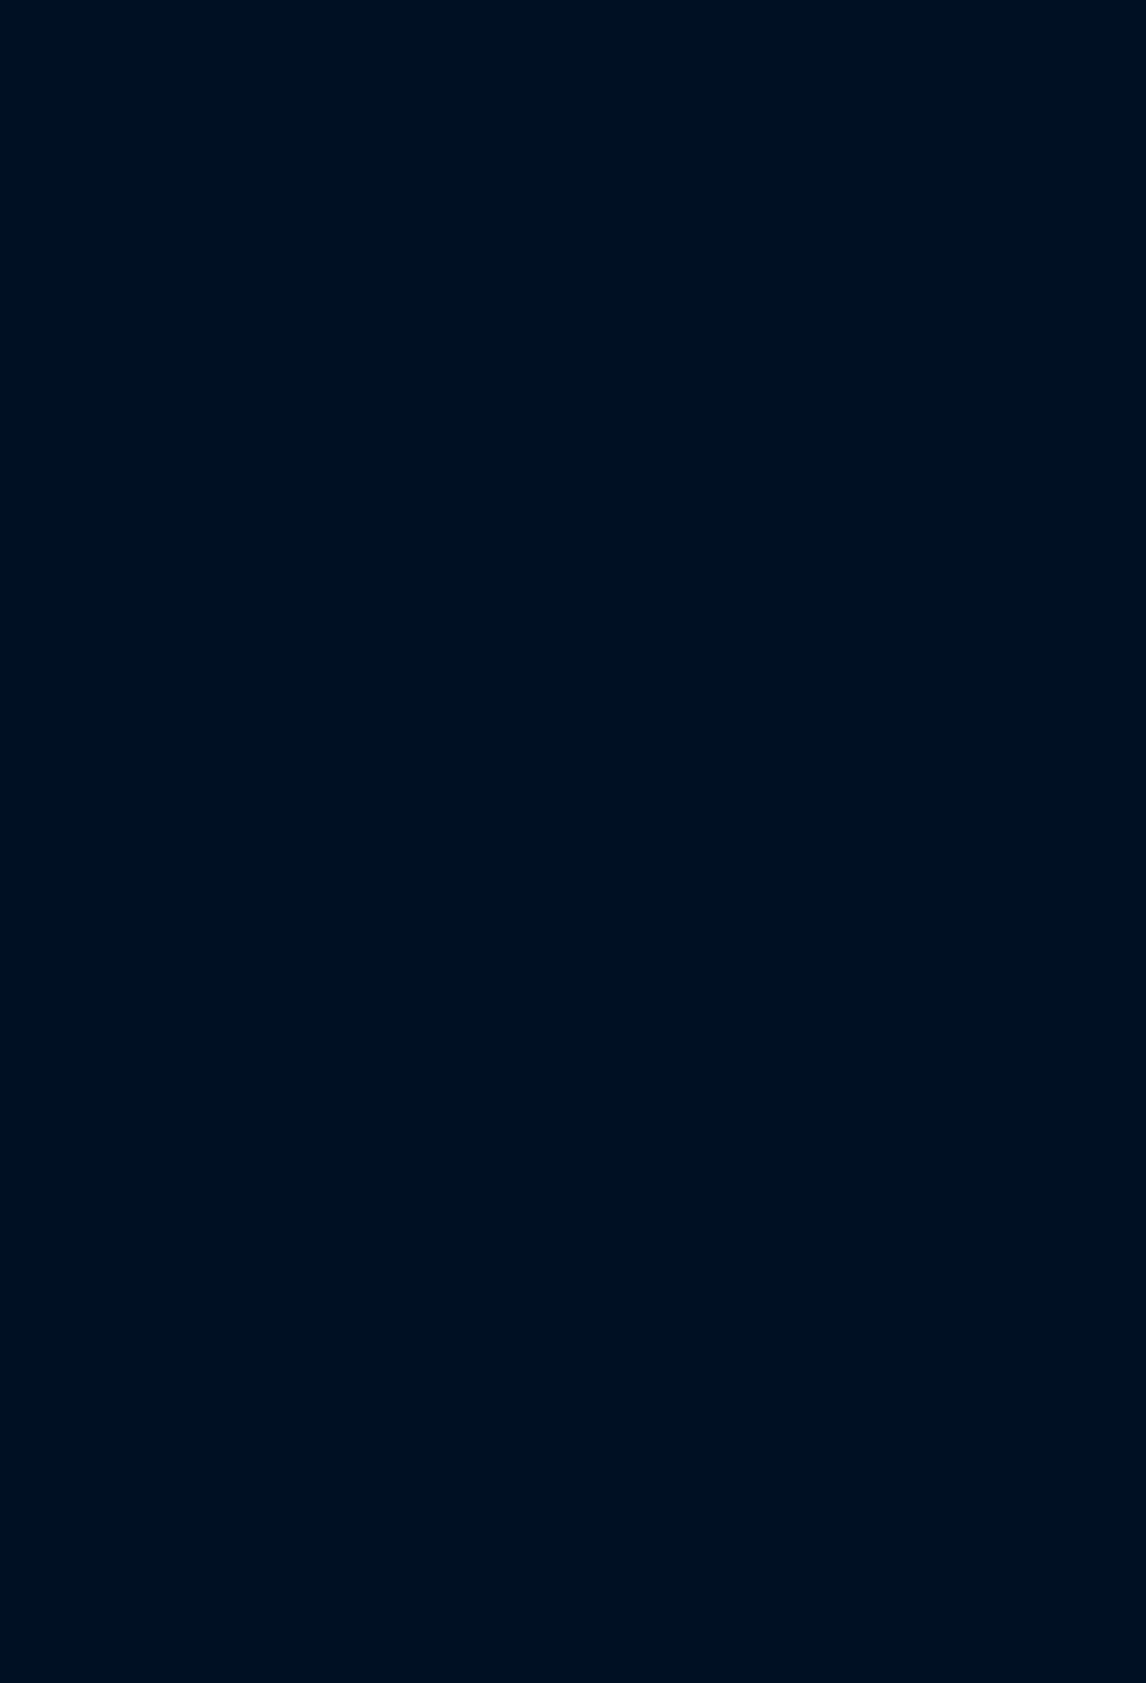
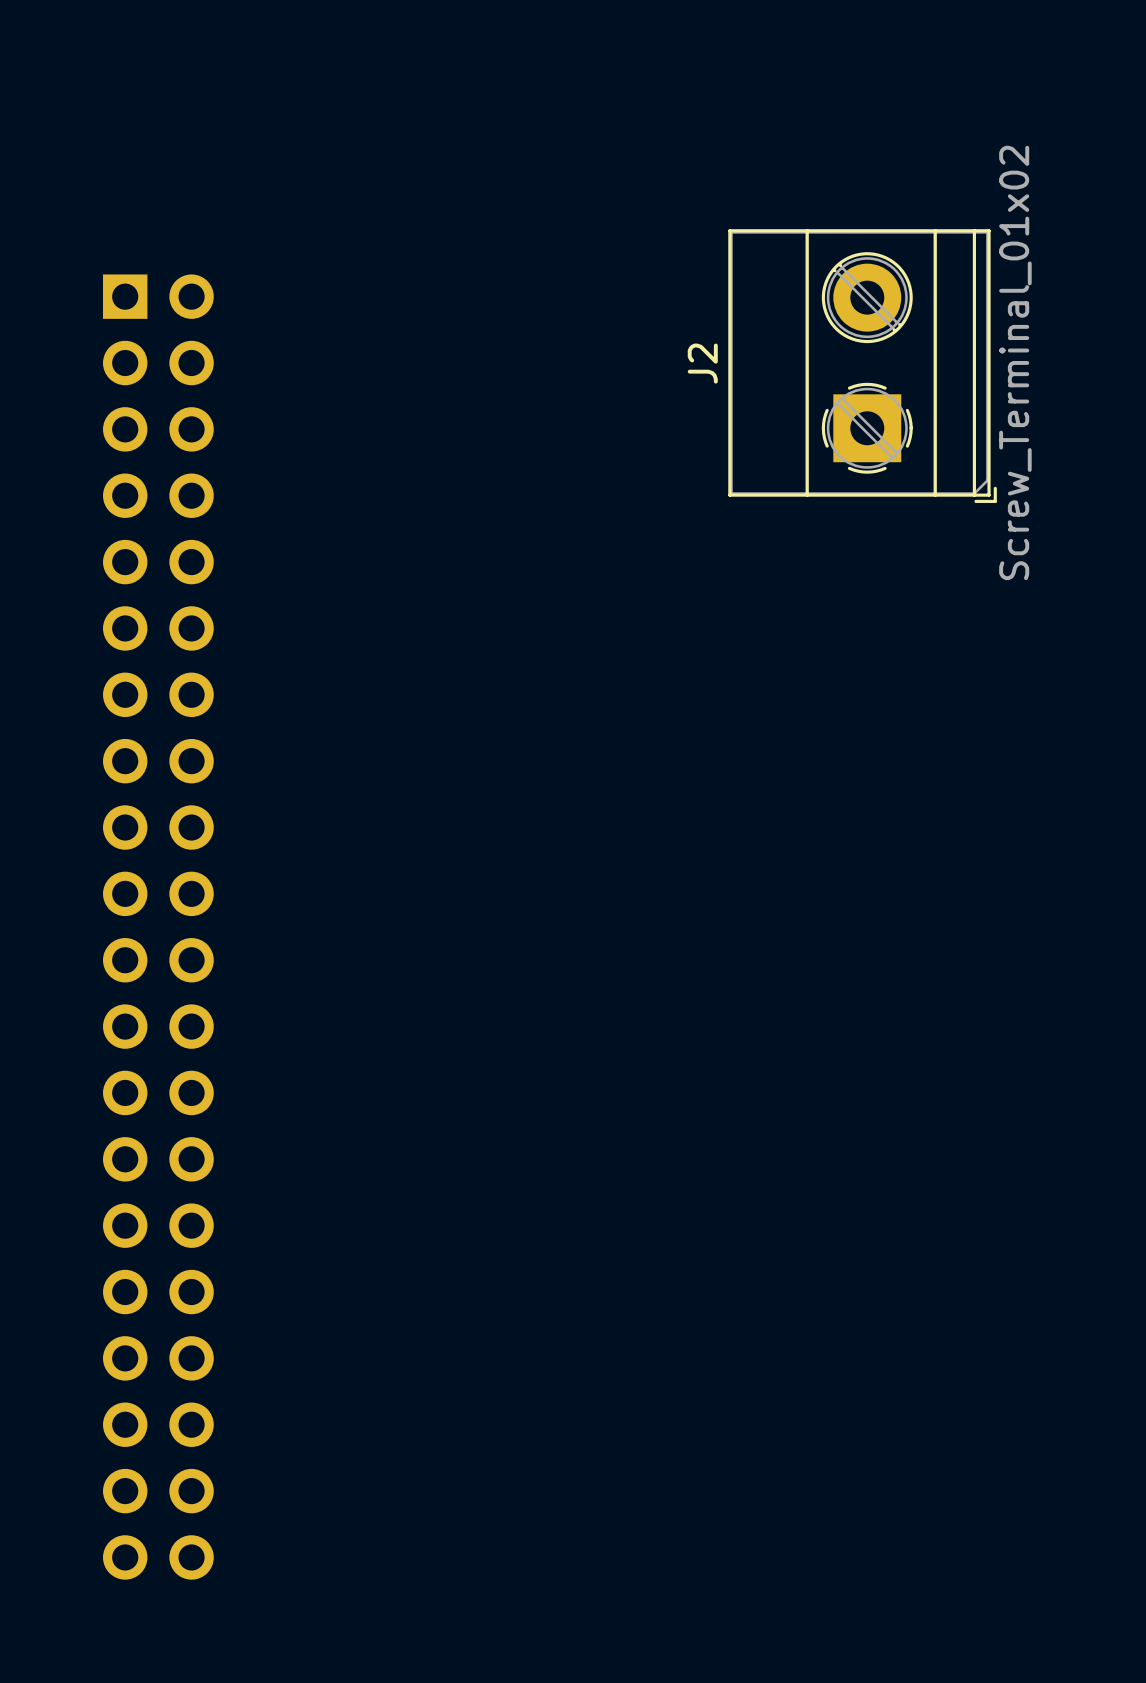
J2: none -> Screw_Terminal_01x02 (862, 366)
part: none -> (158, 927)

